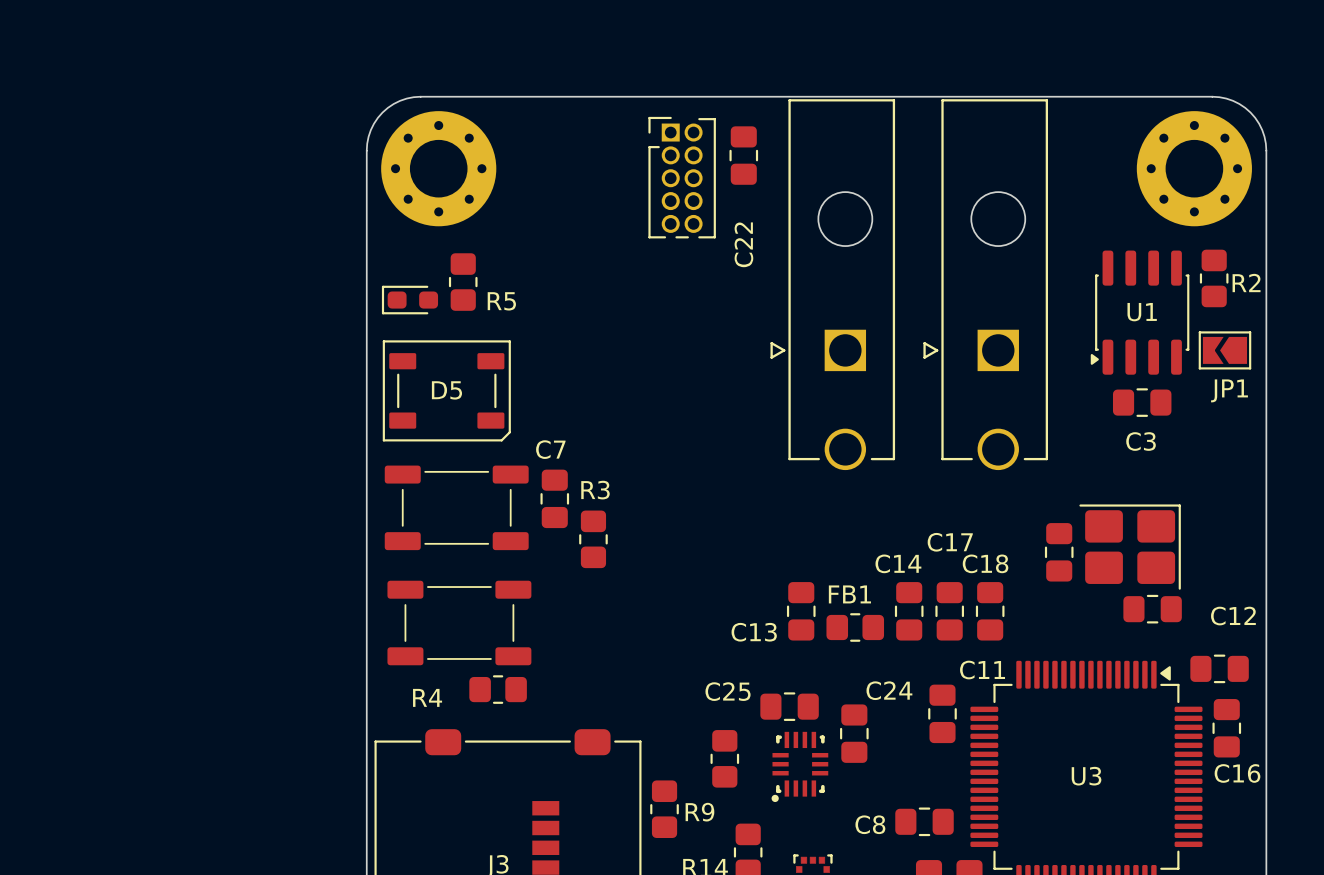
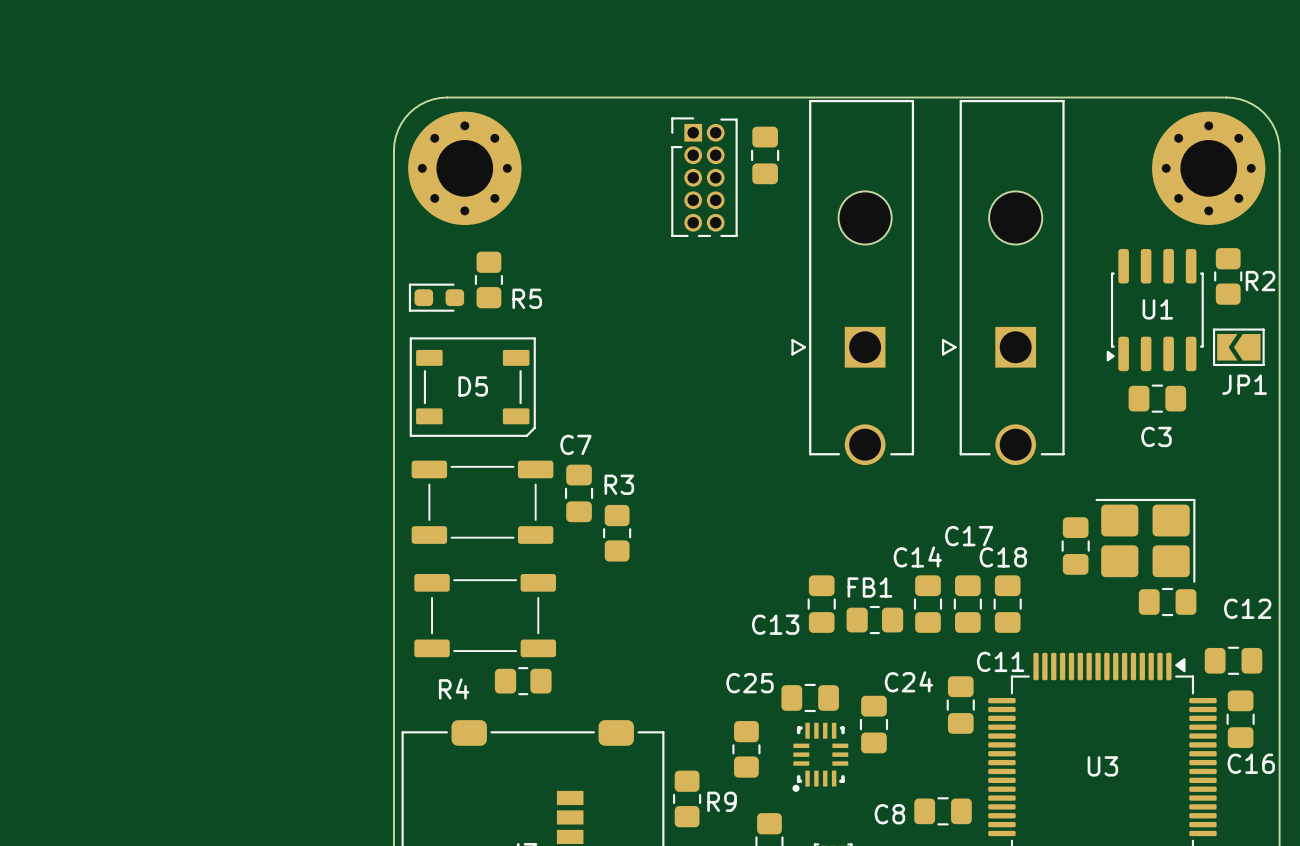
C22 name: C22 (743, 244) -> none

